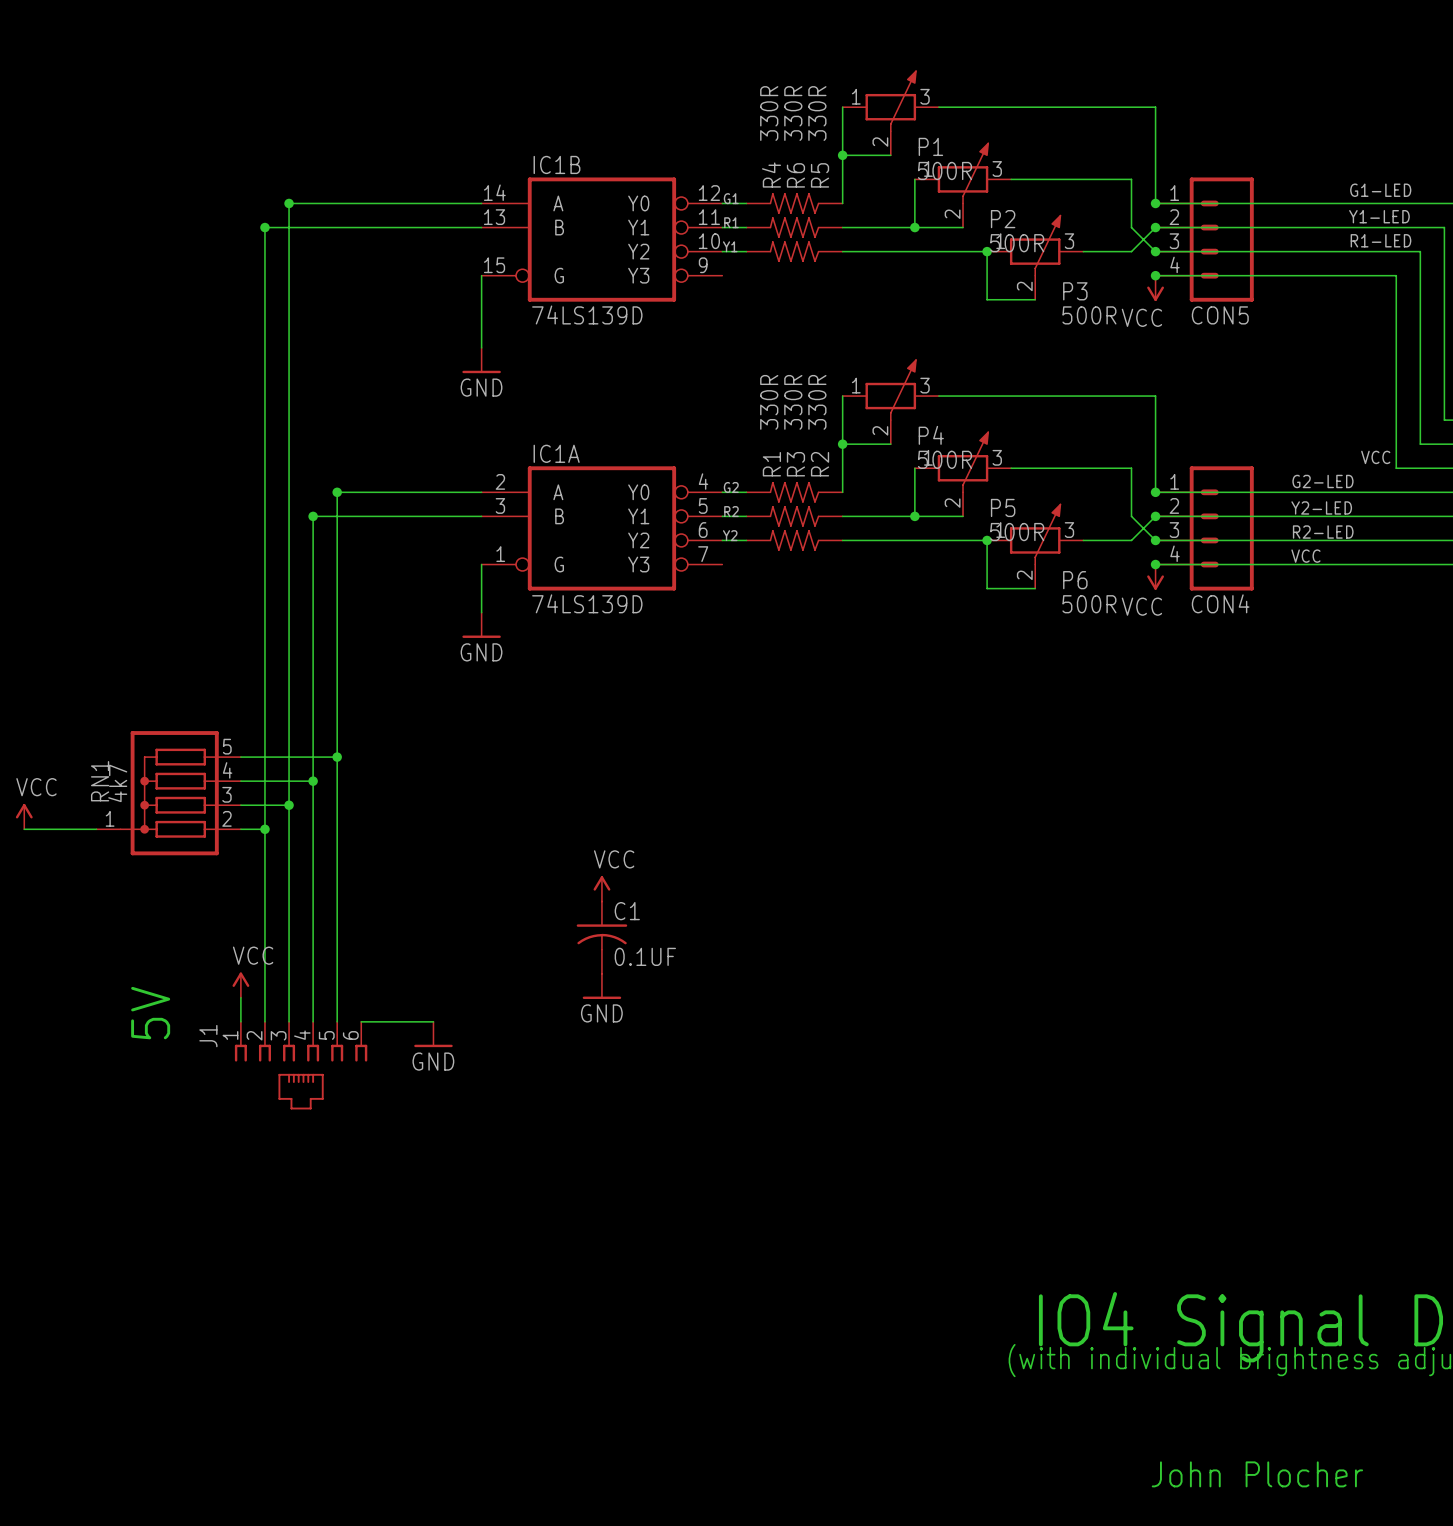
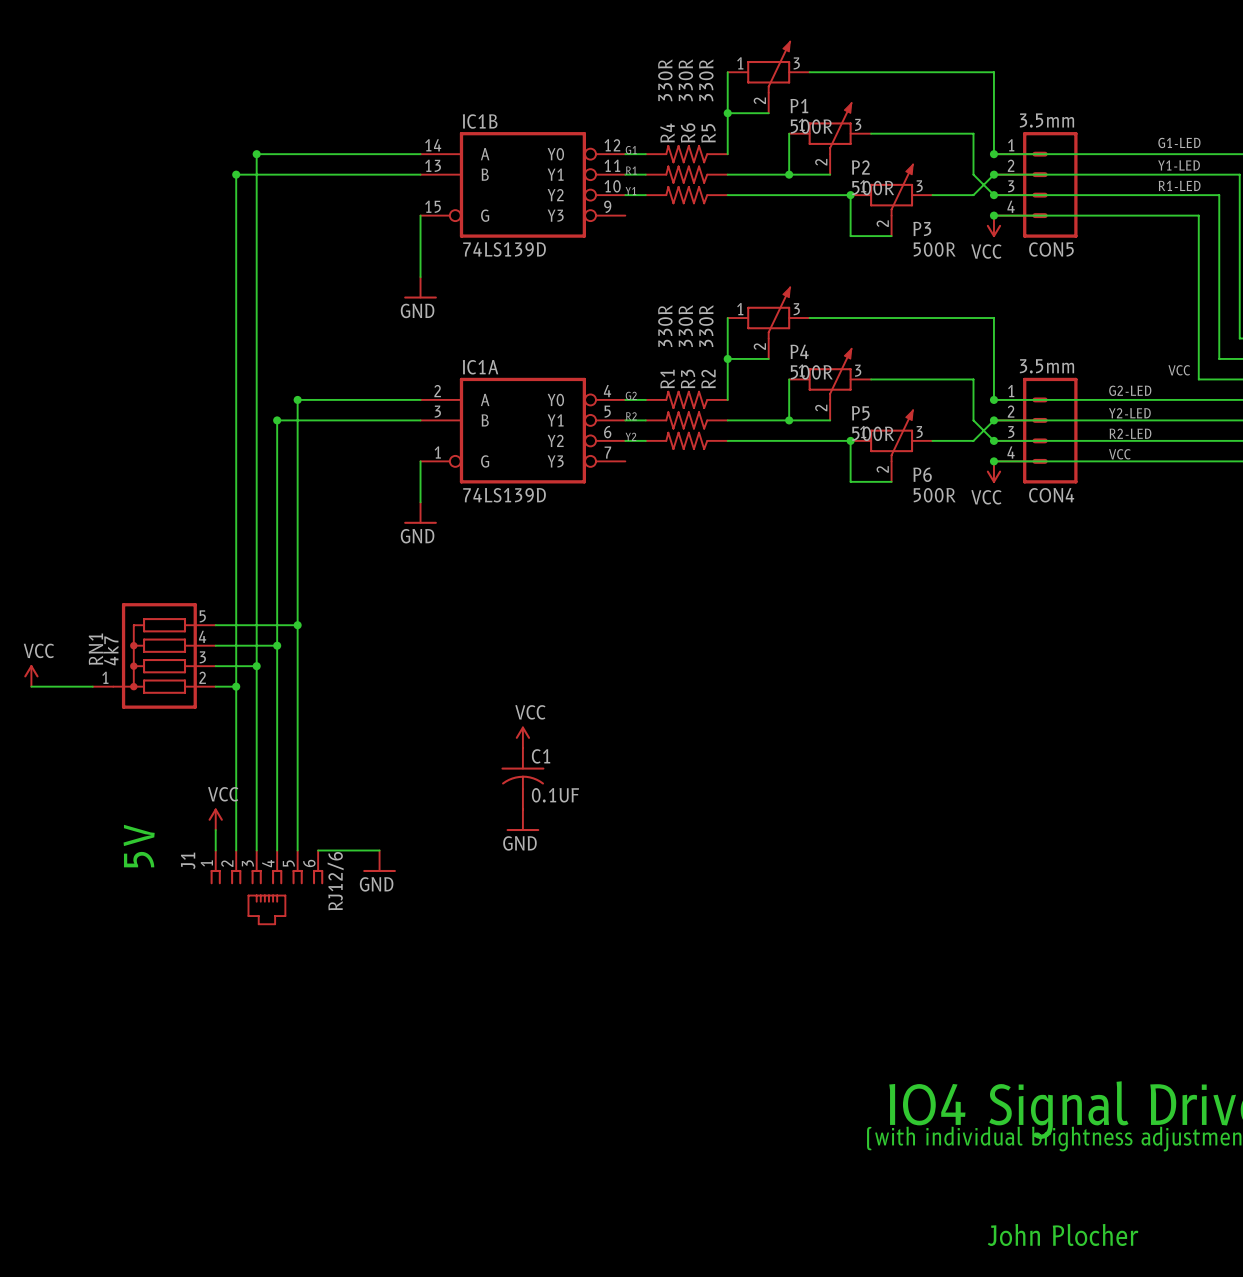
CON5 value: none -> 3.5mm (1046, 120)
CON4 value: none -> 3.5mm (1046, 366)
J1 value: none -> RJ12/6 (335, 881)

